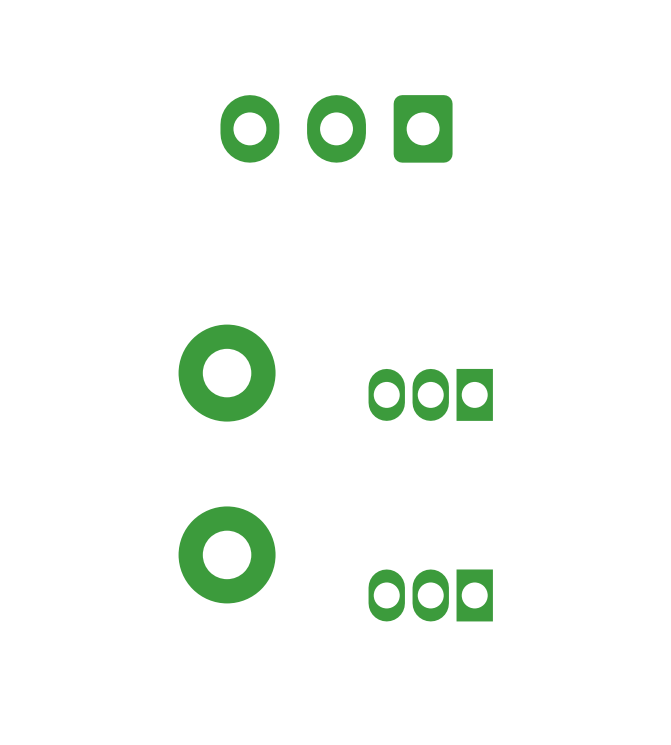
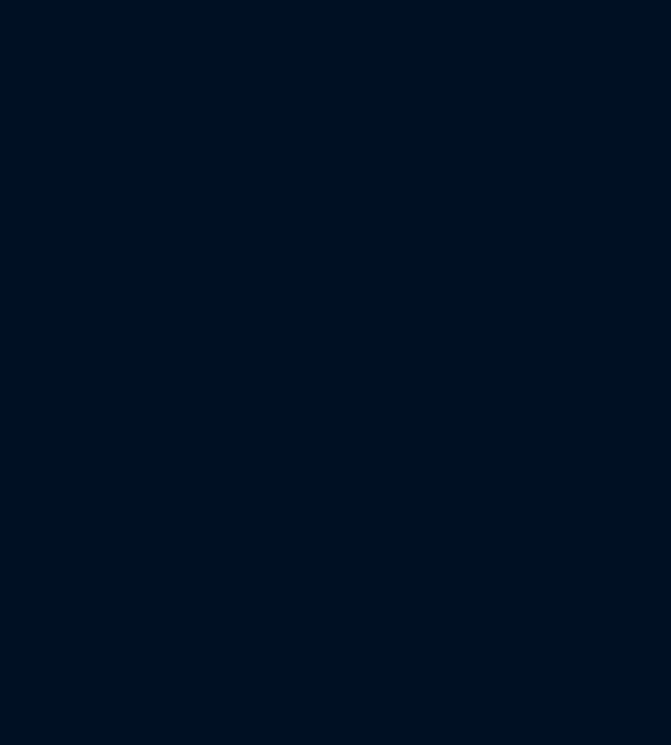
part: (336, 128) -> none
part: (227, 373) -> none
part: (430, 394) -> none
part: (227, 554) -> none
part: (430, 595) -> none

